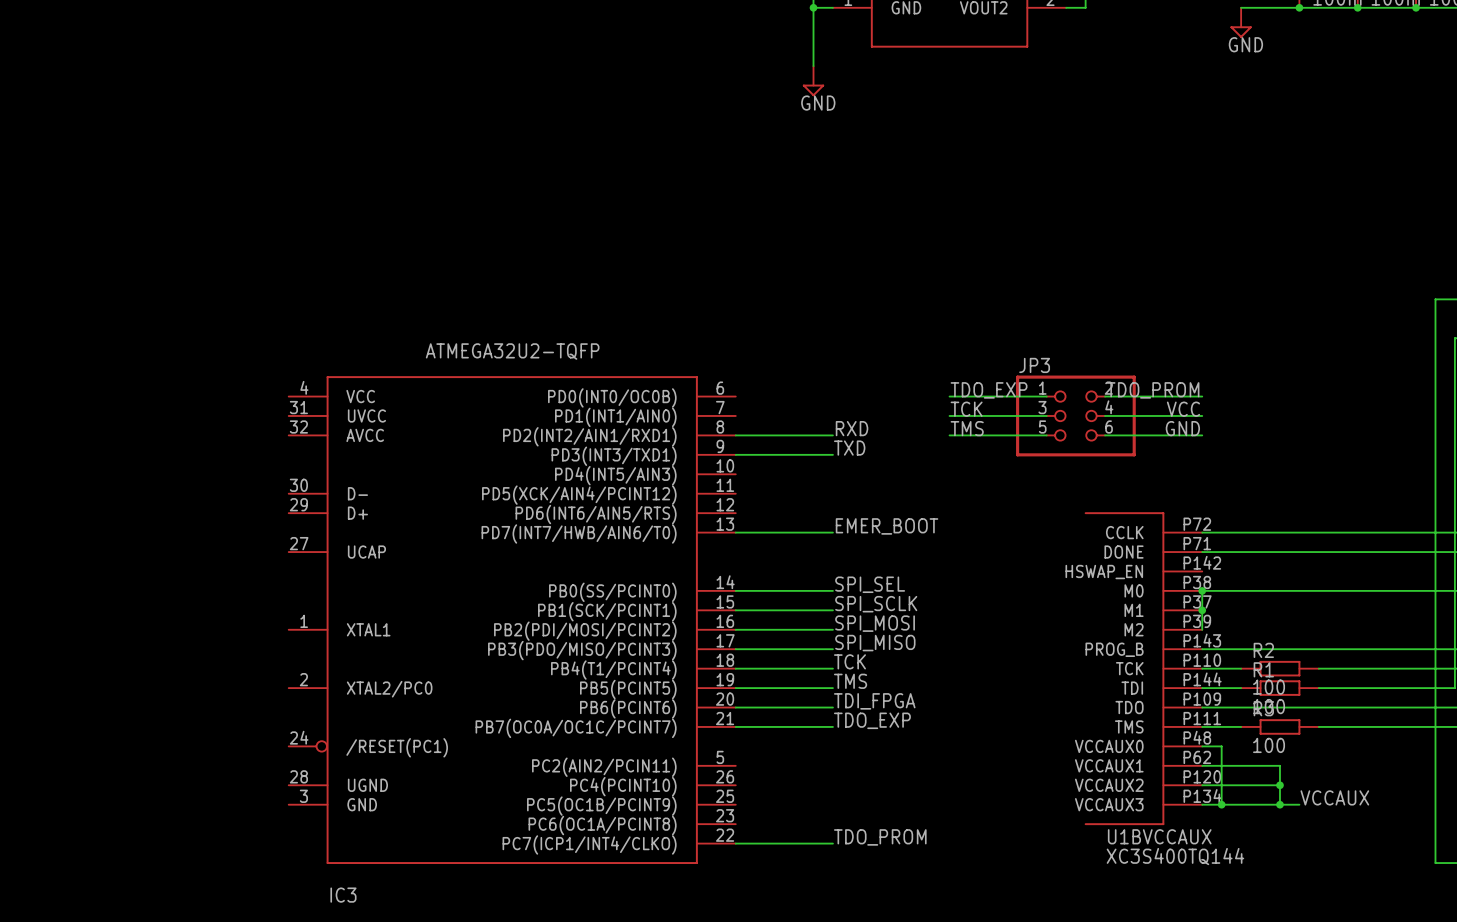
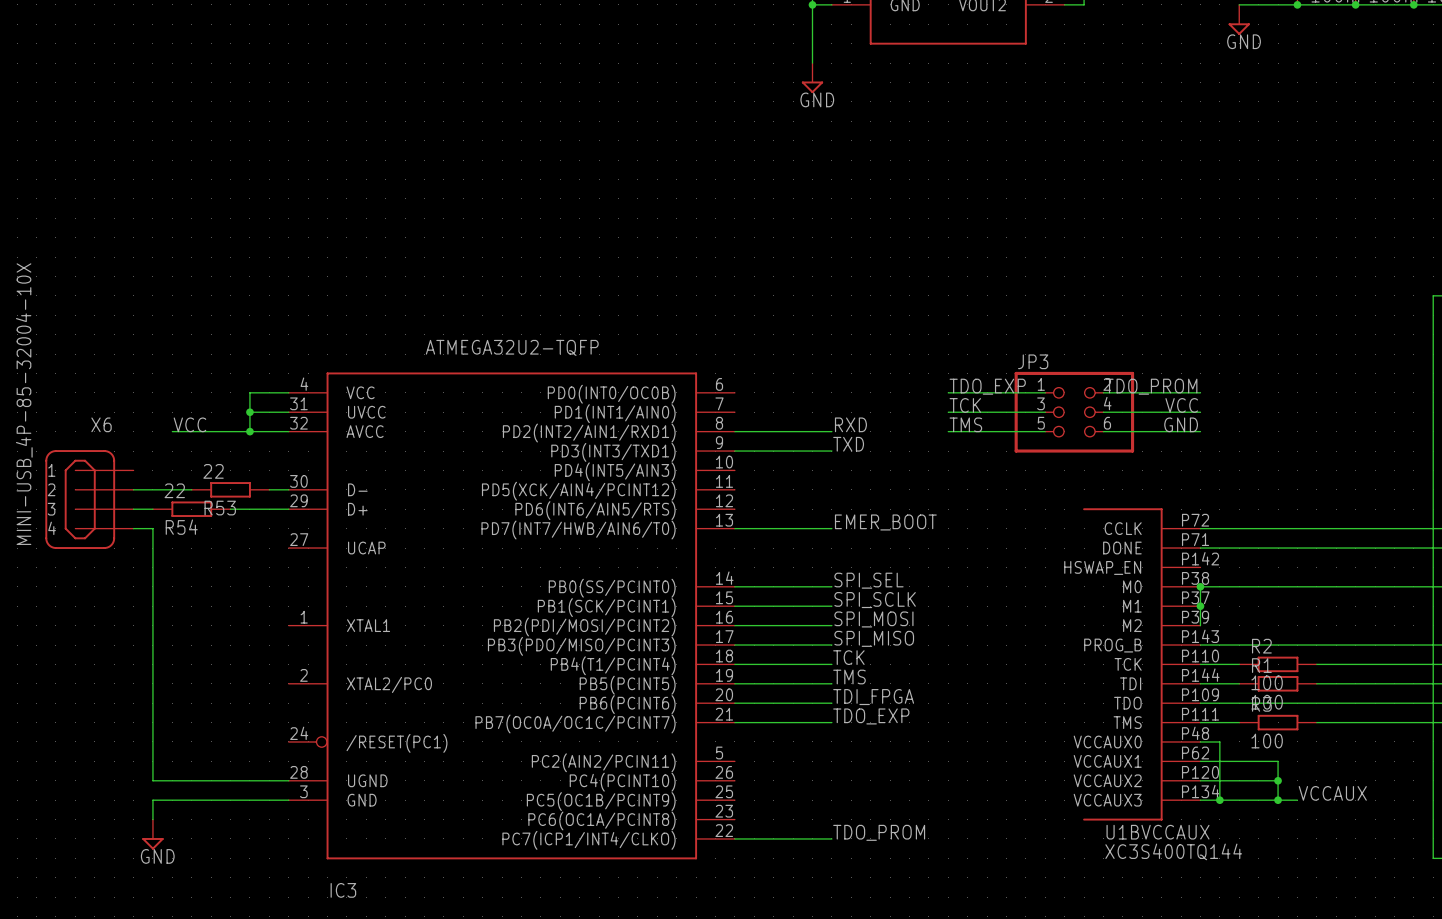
wire: none -> (288, 392) (249, 392) (249, 431)
wire: none -> (249, 412) (288, 412)
junction: none -> (249, 412)
label: none -> VCC (189, 424)
wire: none -> (172, 431) (288, 431)
junction: none -> (249, 431)
wire: none -> (133, 489) (191, 489)
R53: none -> 22 (230, 489)
wire: none -> (269, 489) (288, 489)
X6: none -> MINI-USB_4P-85-32004-10X (89, 499)
wire: none -> (133, 509) (152, 509)
R54: none -> 22 (191, 509)
wire: none -> (230, 509) (288, 509)
wire: none -> (133, 528) (152, 528) (152, 780) (288, 780)
wire: none -> (288, 800) (152, 800) (152, 819)
power symbol: none -> GND (152, 834)

